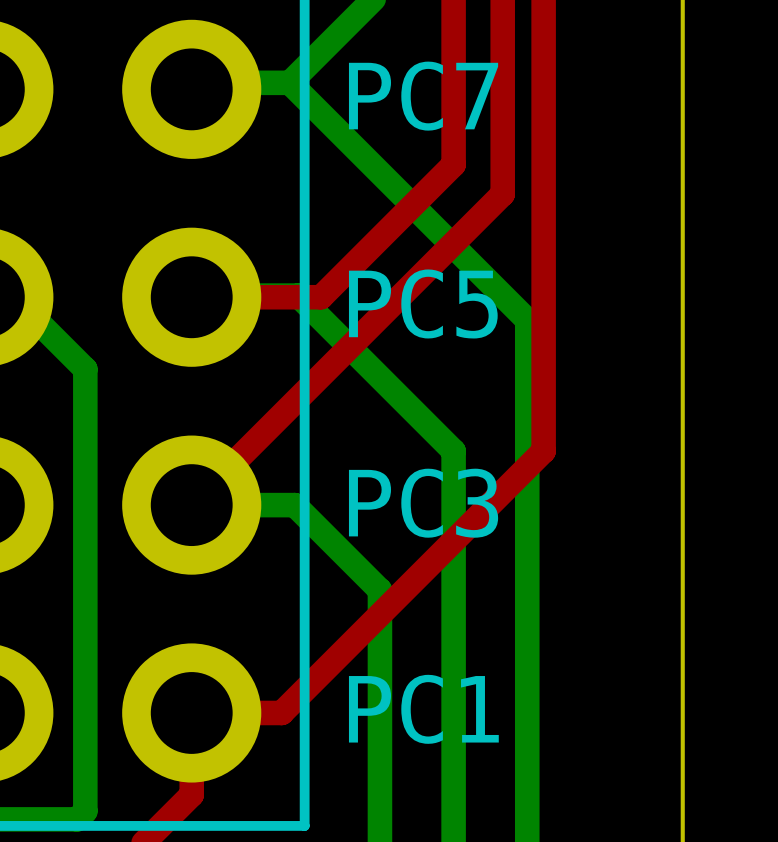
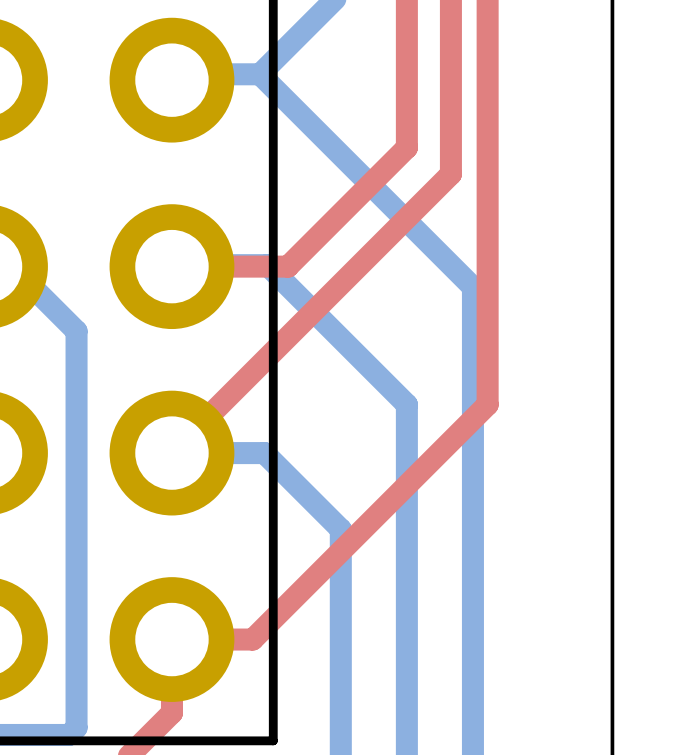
text: PC7 (423, 96) -> none
text: PC5 (423, 303) -> none
text: PC3 (423, 503) -> none
text: PC1 (423, 709) -> none

